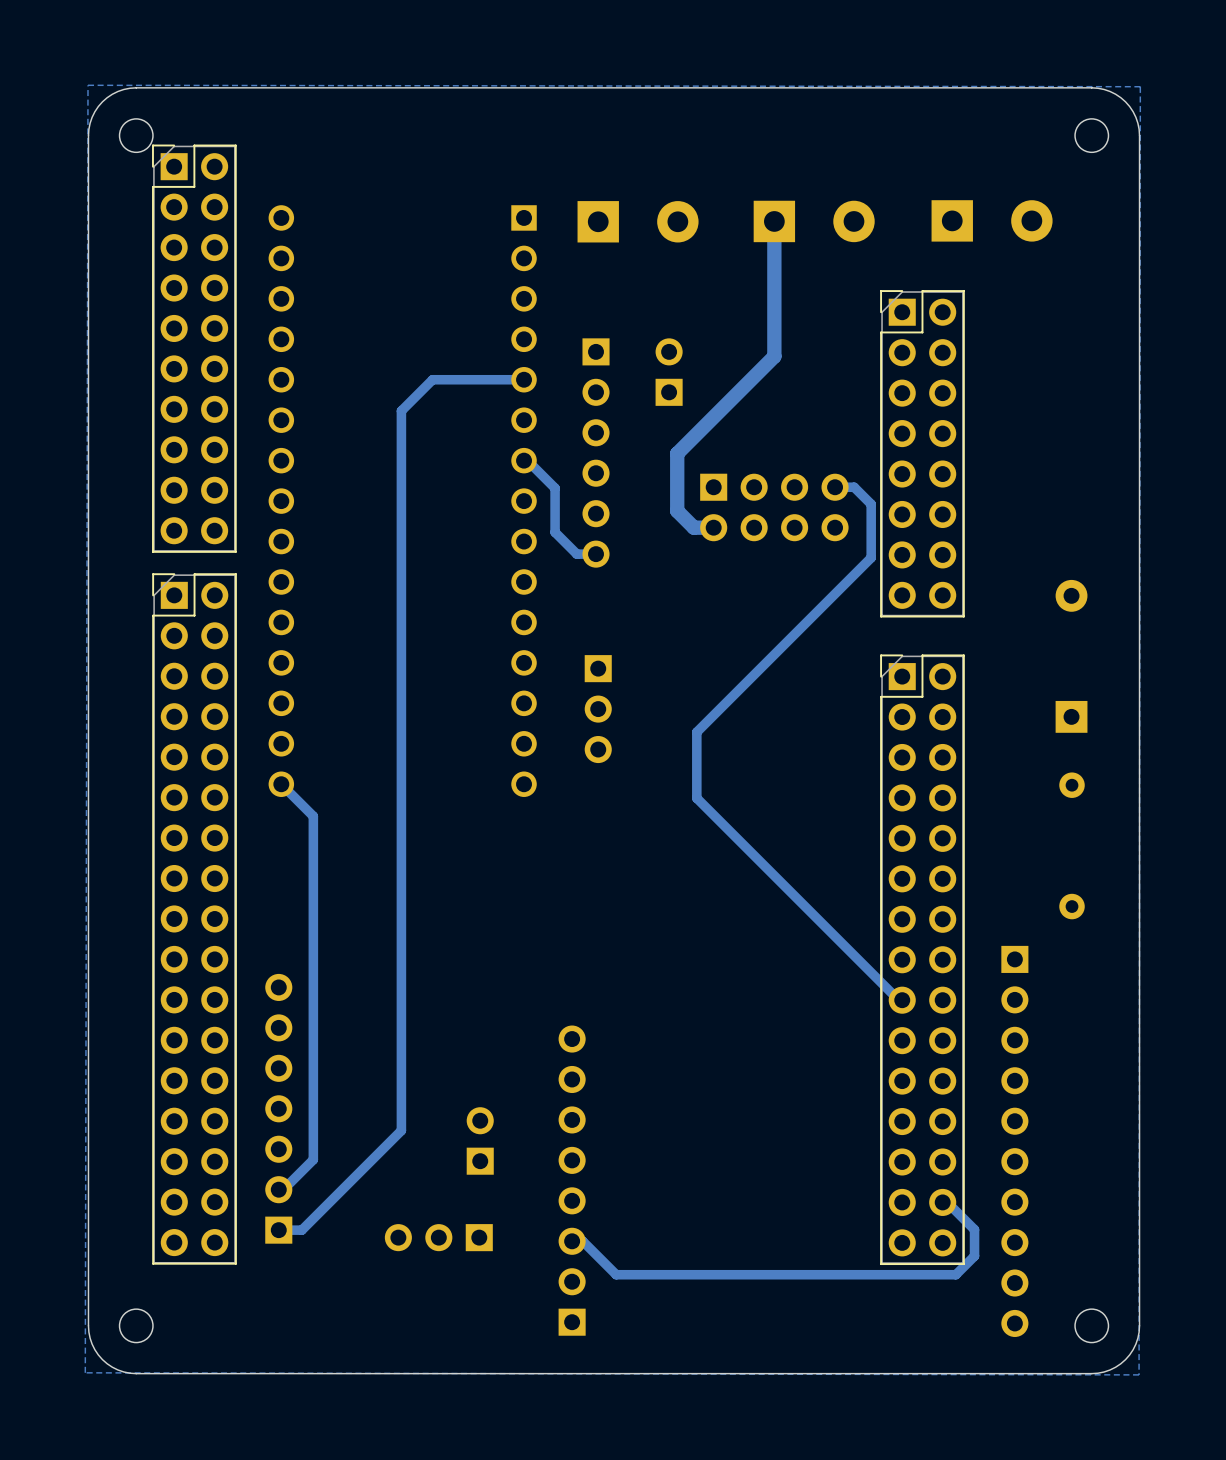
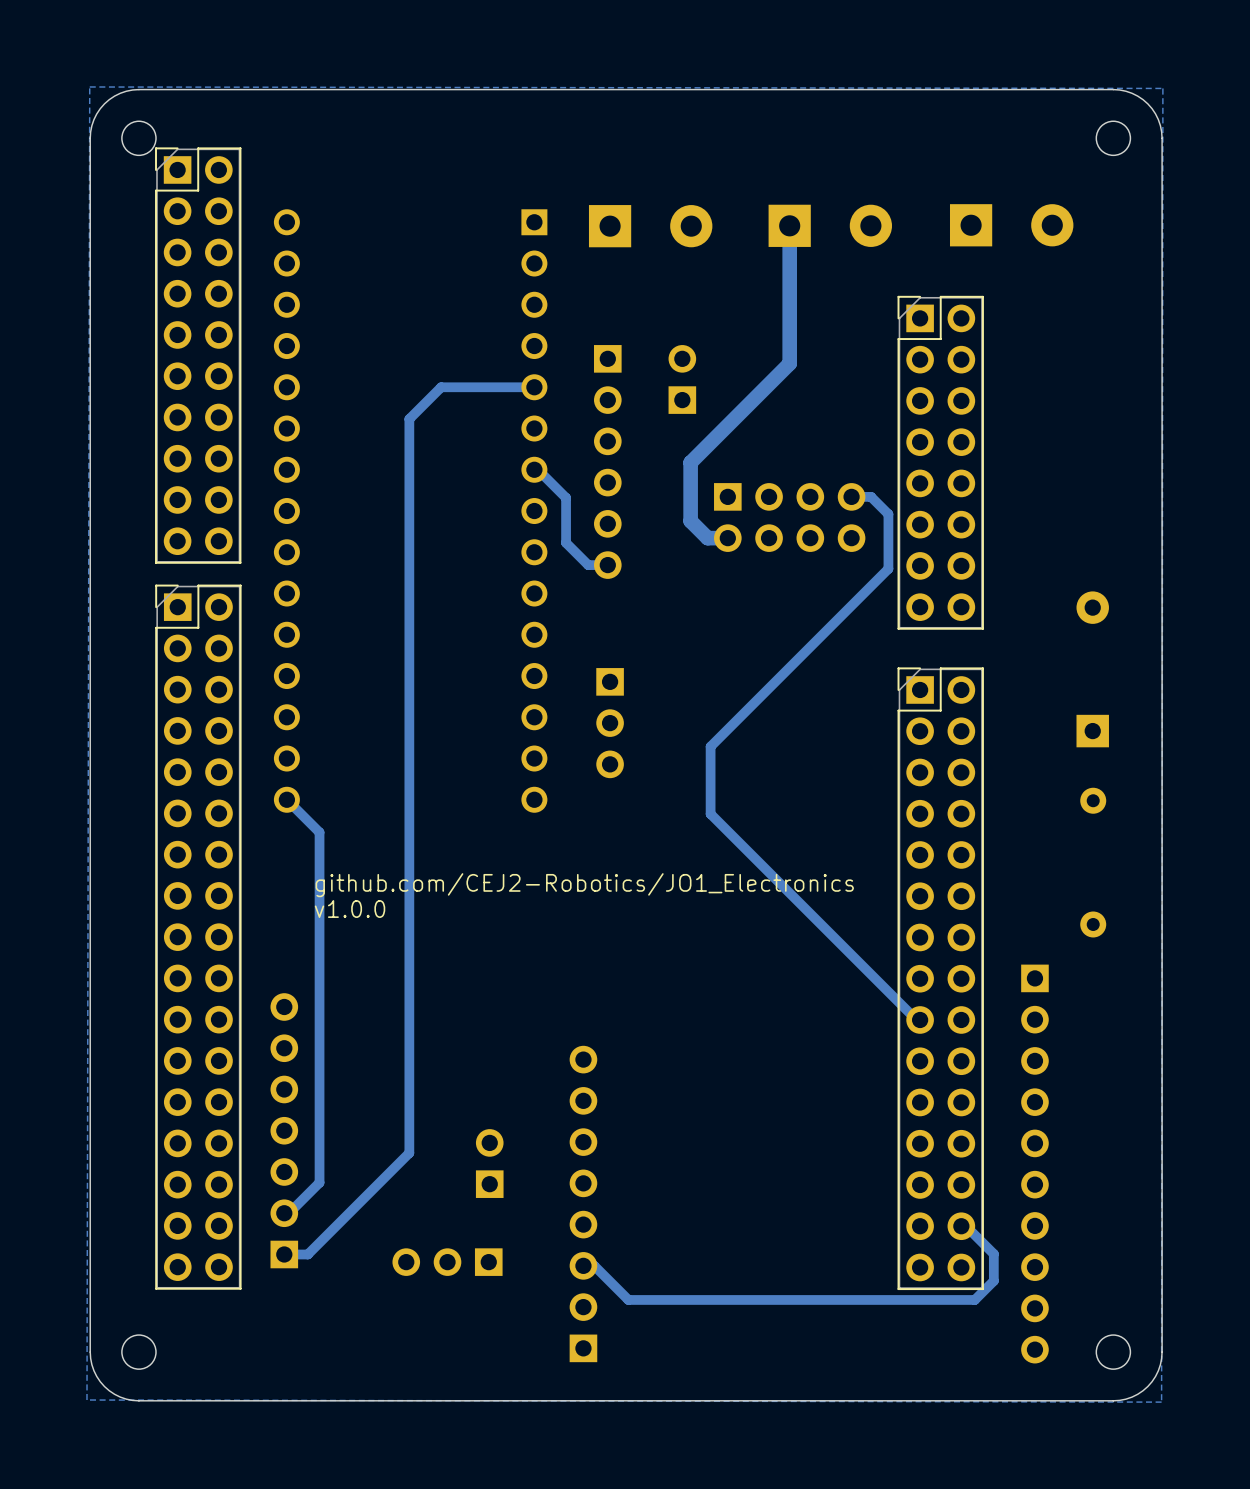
text: none -> github.com/CEJ2-Robotics/JO1_Electronics (584, 885)
text: none -> v1.0.0 (350, 909)

